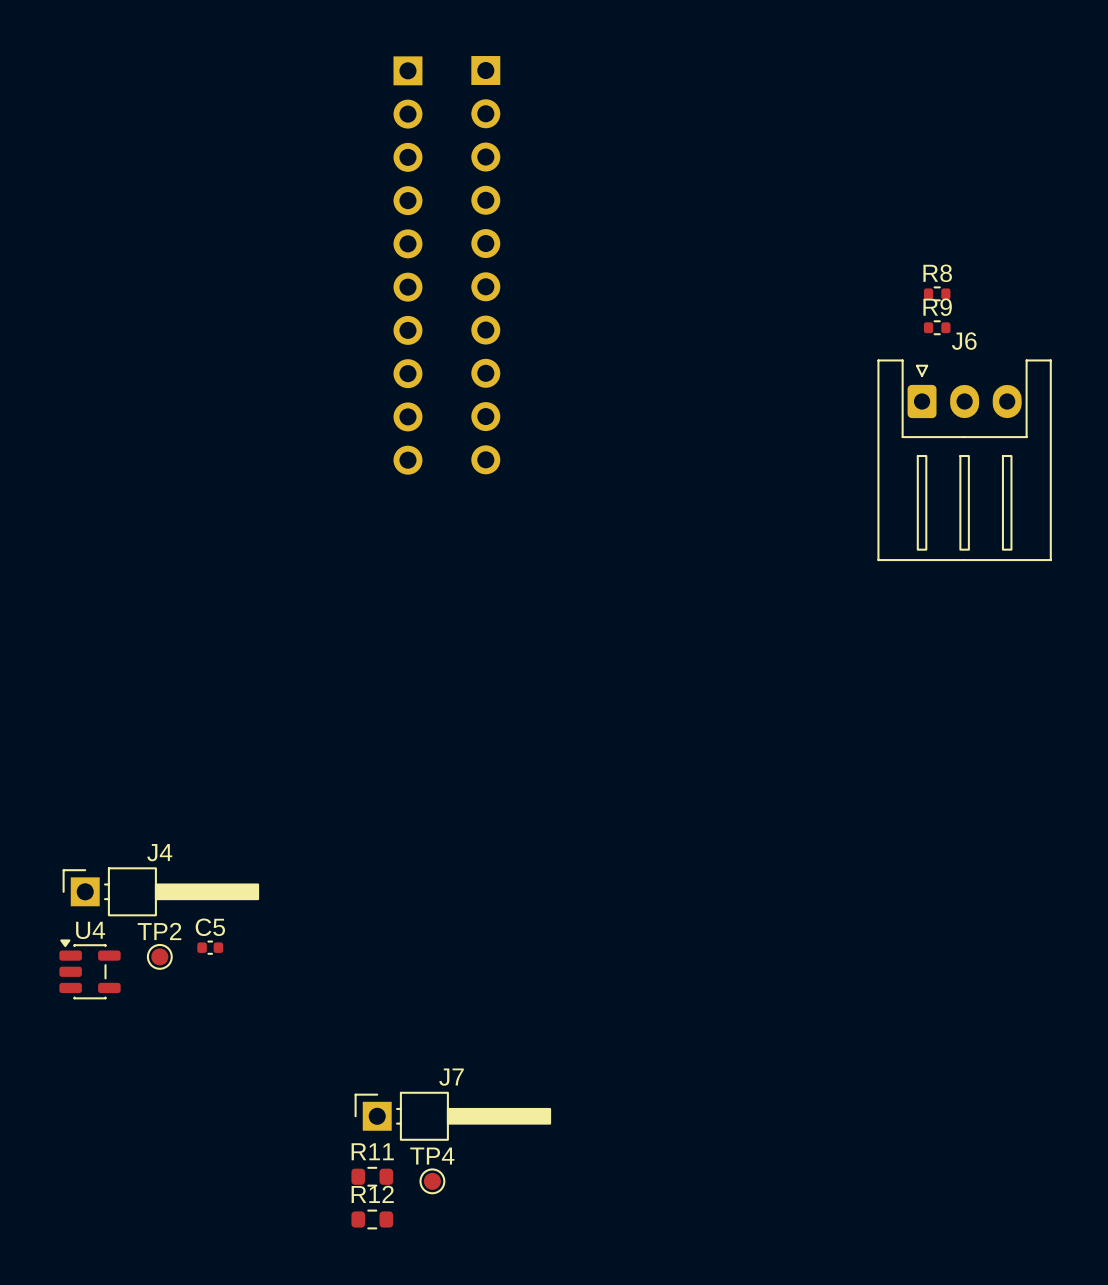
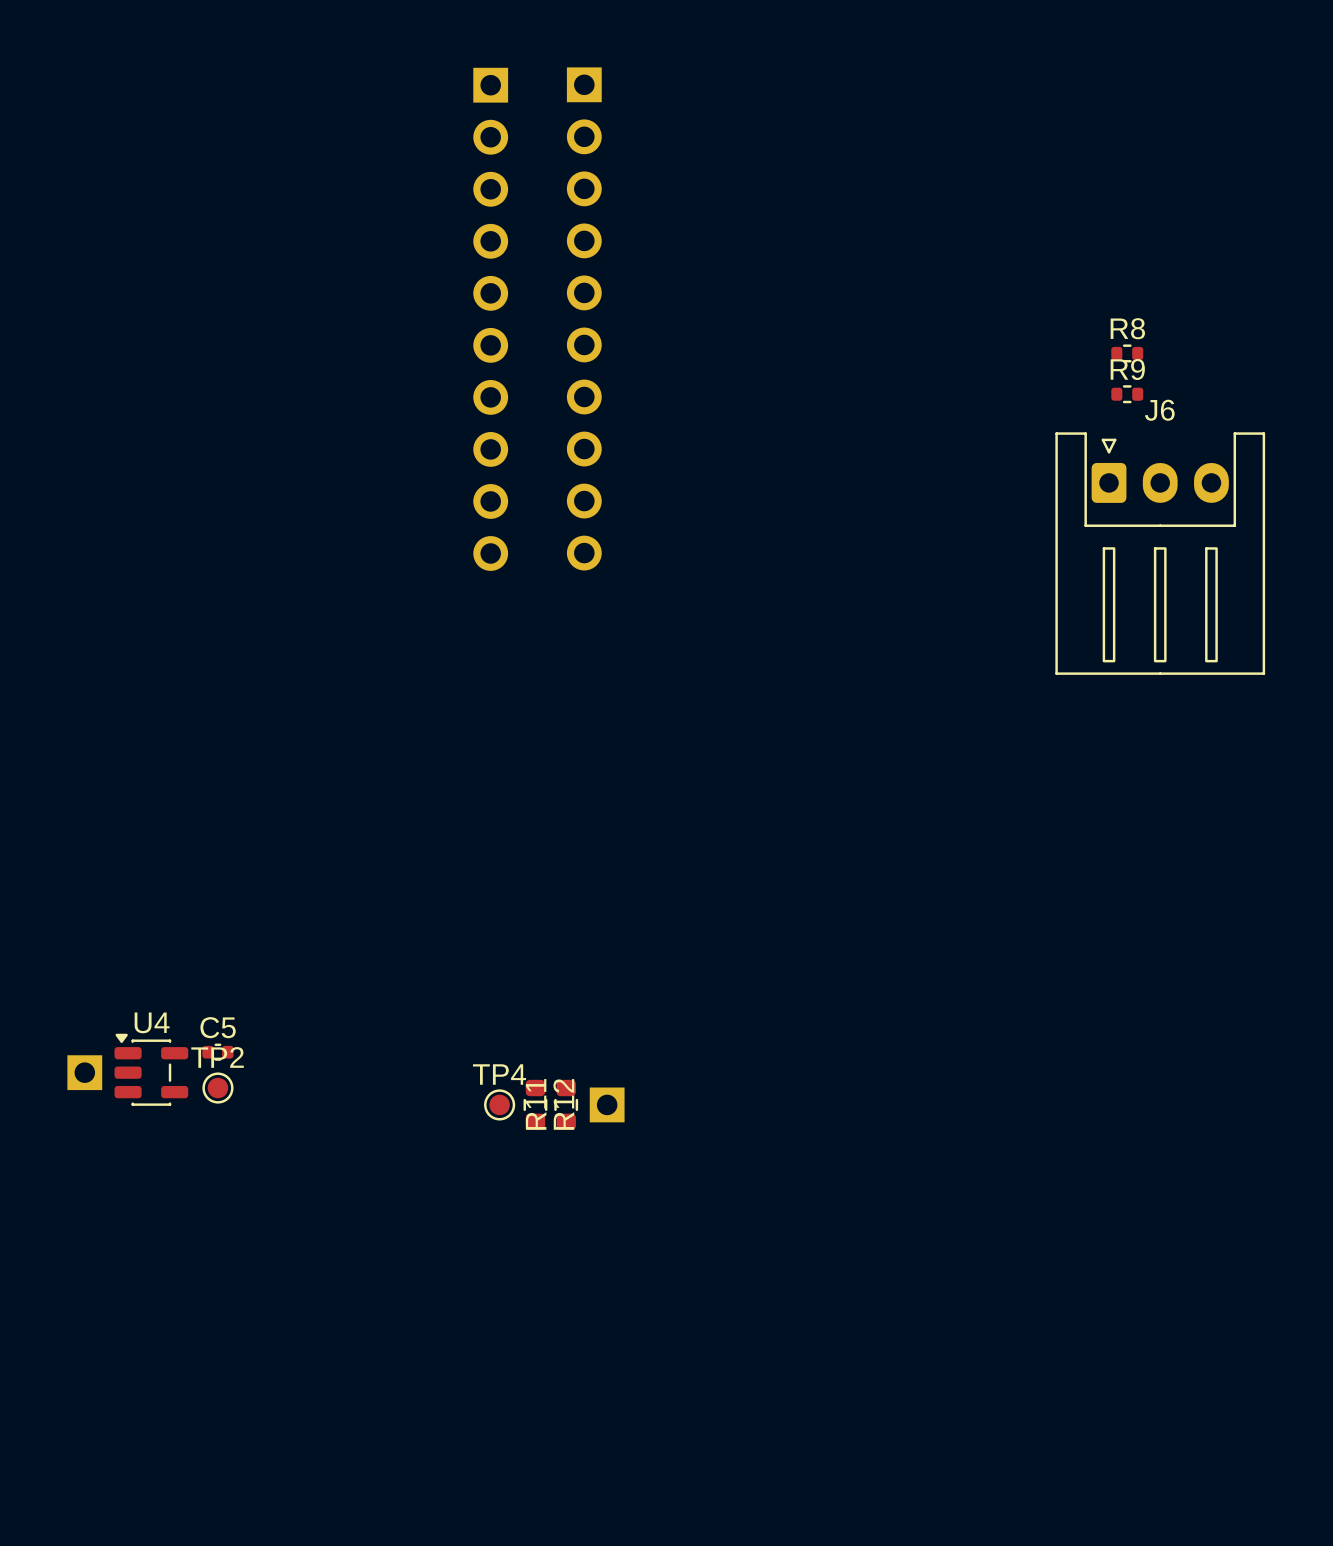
J4 side: top (160, 891) -> bottom (84, 1072)
C5 position: (210, 947) -> (217, 1052)
TP2 position: (159, 956) -> (217, 1088)
U4 position: (90, 969) -> (151, 1069)
J7 side: top (452, 1116) -> bottom (607, 1104)
R11 name position: R11 (372, 1151) -> R11 (536, 1104)
R11 rotation: 0° (372, 1176) -> 90° clockwise (566, 1104)
R11 position: (372, 1176) -> (566, 1104)
TP4 position: (432, 1181) -> (499, 1104)
R12 rotation: 0° (372, 1219) -> 90° clockwise (535, 1104)
R12 position: (372, 1219) -> (535, 1104)

